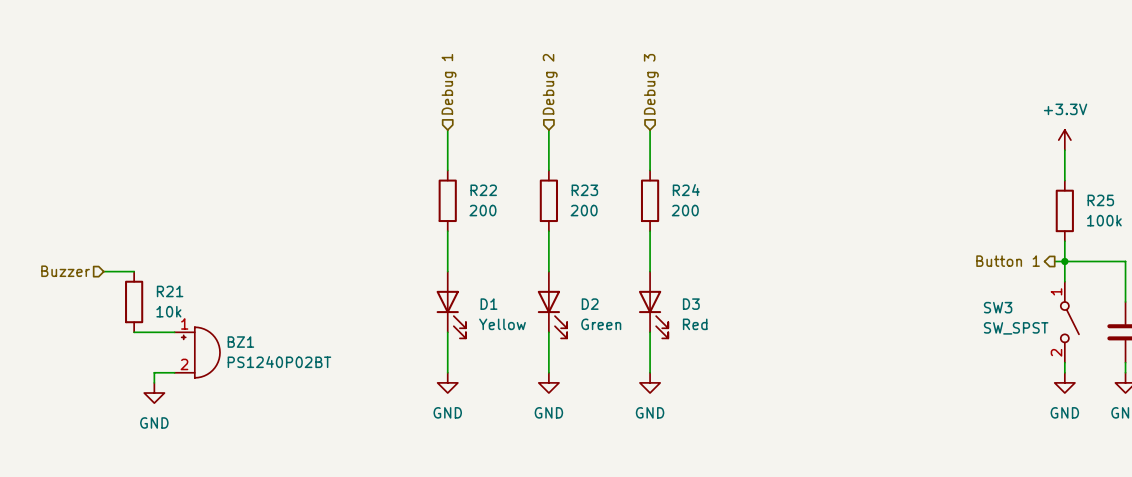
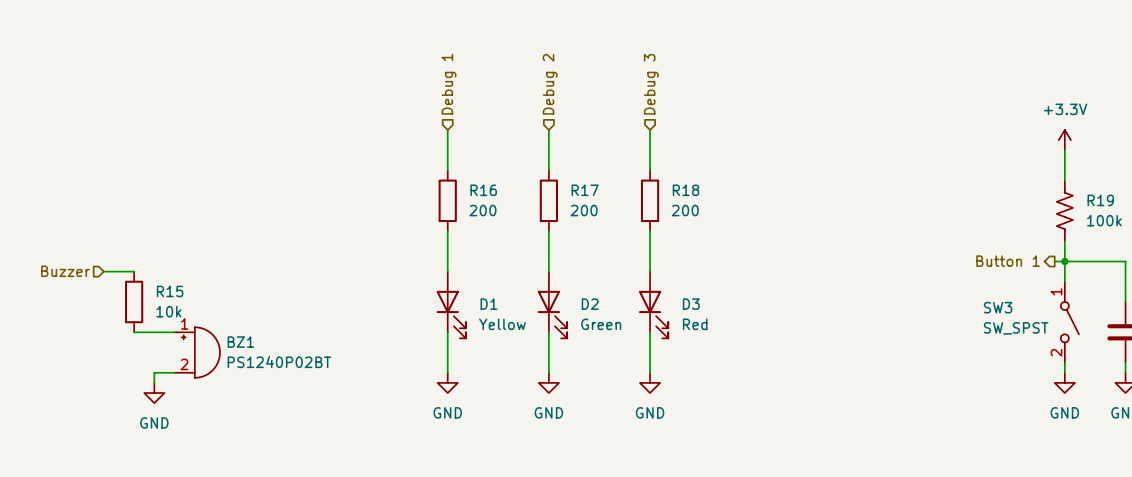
R22 name: R22 (483, 190) -> R16 (483, 190)
R23 name: R23 (584, 190) -> R17 (585, 190)
R24 name: R24 (686, 190) -> R18 (686, 190)
R25: 100k (1064, 210) -> none
R19: none -> 100k (1064, 210)
R21 name: R21 (170, 291) -> R15 (170, 291)

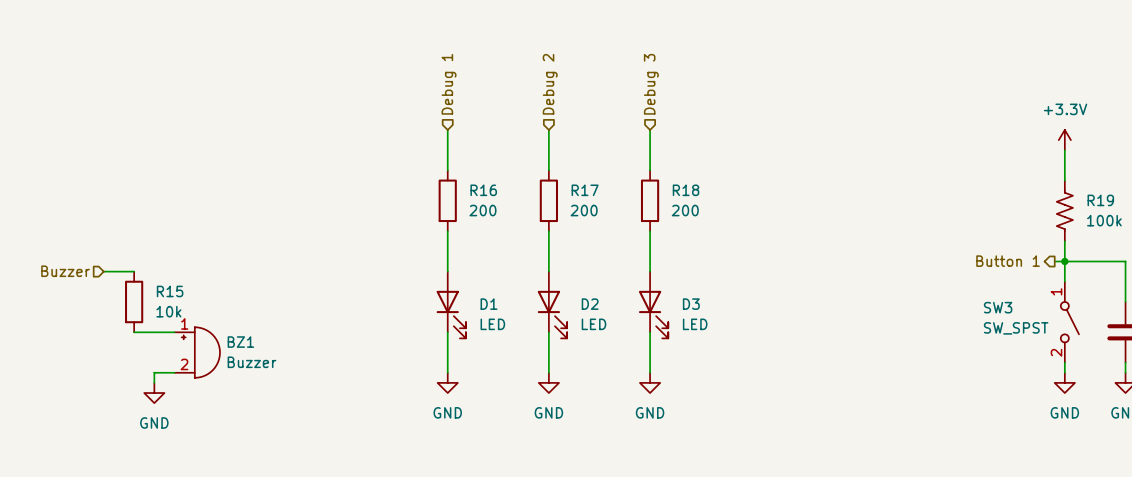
D1 value: Yellow (502, 324) -> LED (492, 324)
D2 value: Green (601, 324) -> LED (594, 324)
D3 value: Red (695, 324) -> LED (695, 324)
BZ1 value: PS1240P02BT (279, 362) -> Buzzer (251, 362)

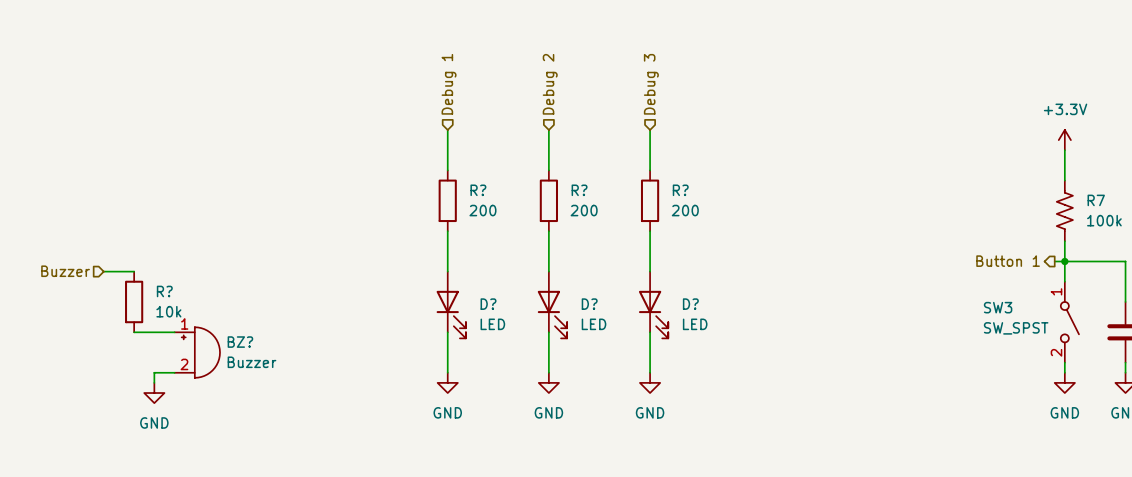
R16 name: R16 (483, 190) -> R? (478, 190)
R17 name: R17 (585, 190) -> R? (579, 190)
R18 name: R18 (686, 190) -> R? (680, 190)
R19 name: R19 (1100, 200) -> R7 (1096, 200)
R15 name: R15 (170, 291) -> R? (164, 291)
D1 name: D1 (489, 304) -> D? (488, 304)
D2 name: D2 (590, 304) -> D? (589, 304)
D3 name: D3 (691, 304) -> D? (690, 304)
BZ1 name: BZ1 (240, 342) -> BZ? (240, 342)

